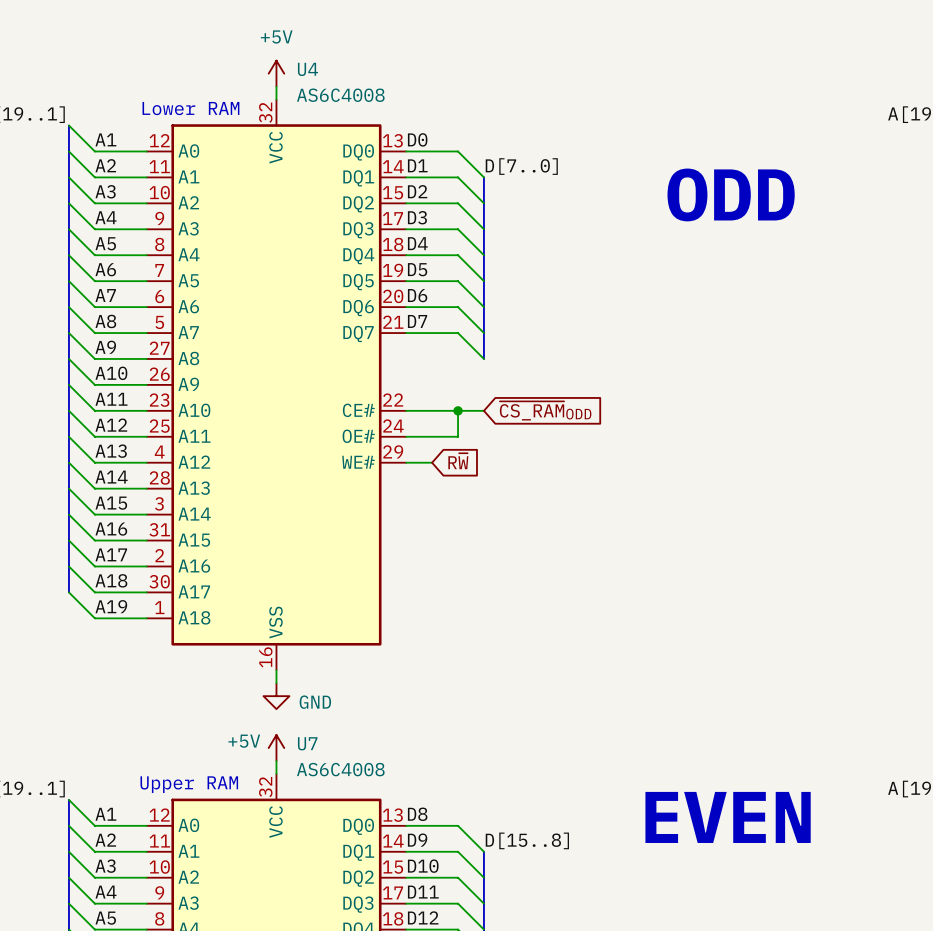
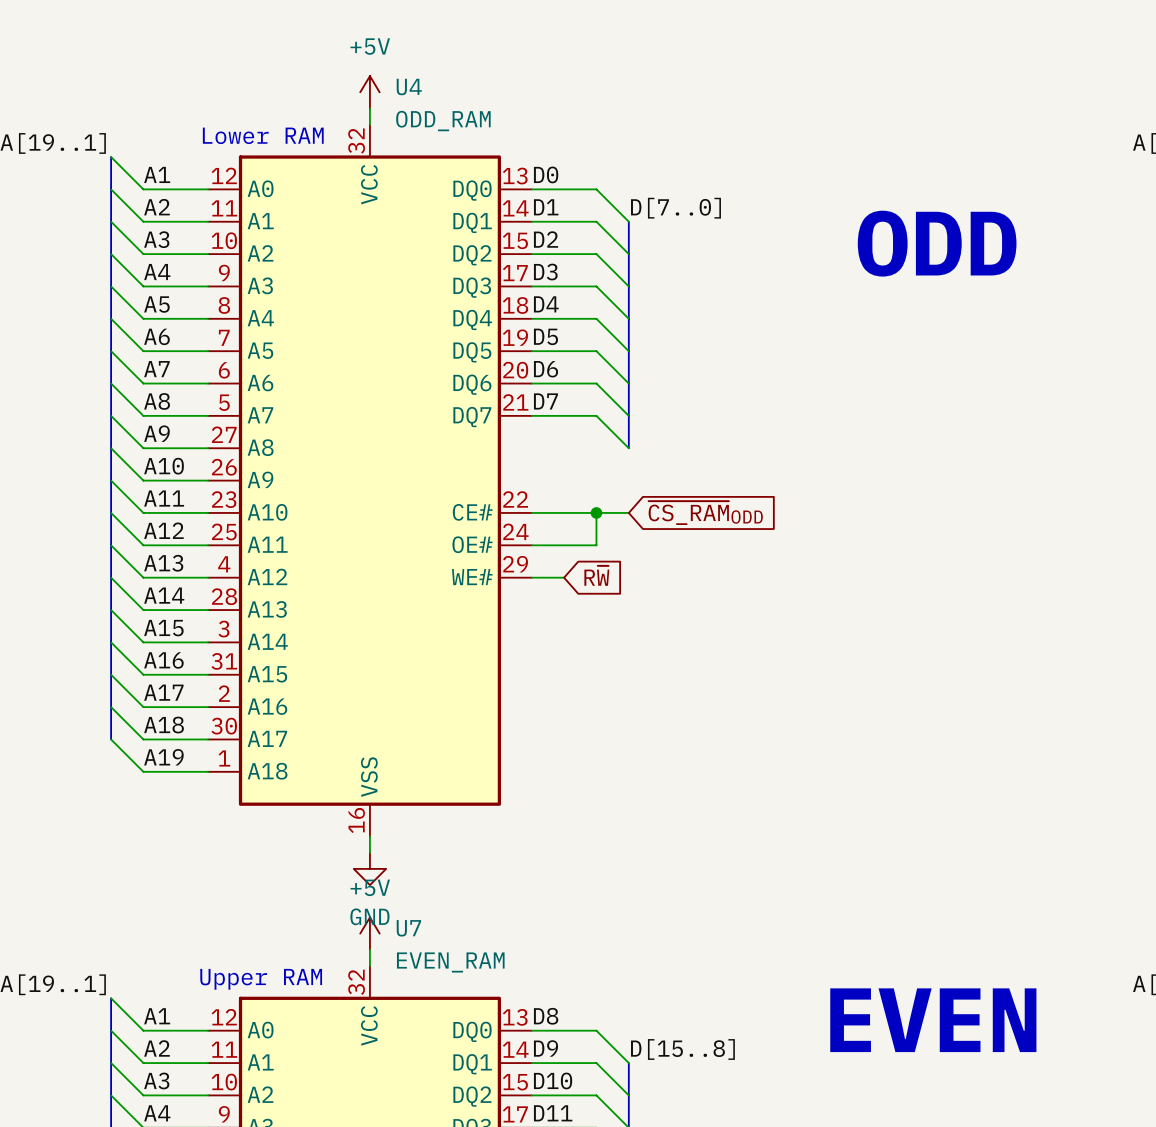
U4 value: AS6C4008 (340, 95) -> ODD_RAM (443, 121)
power symbol text position: GND (315, 702) -> GND (369, 916)
power symbol text position: +5V (244, 741) -> +5V (370, 887)
U7 value: AS6C4008 (340, 769) -> EVEN_RAM (450, 962)

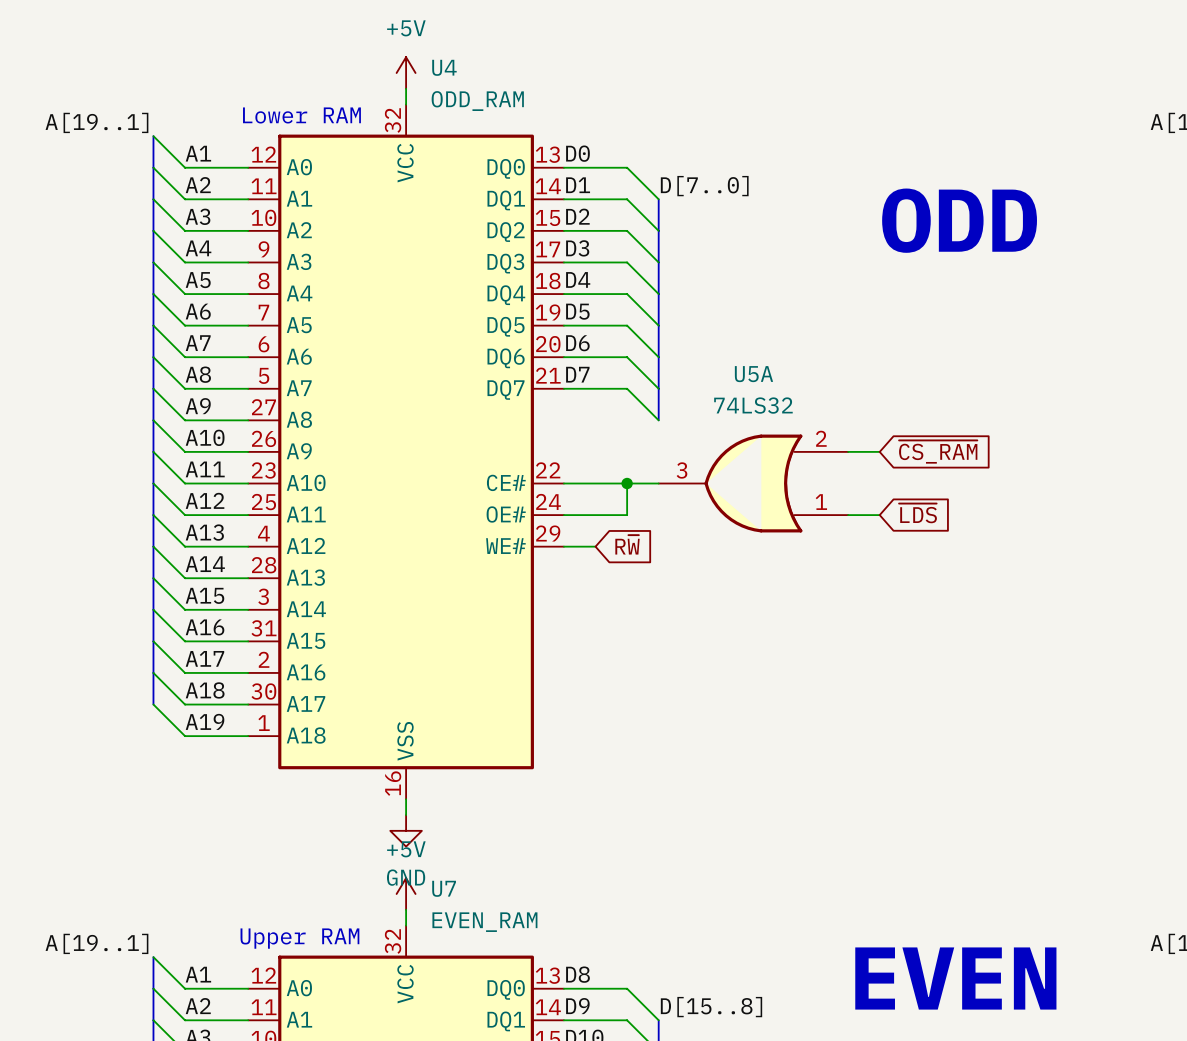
wire: none -> (848, 451) (879, 451)
U5A: none -> 74LS32 (753, 483)
global label: ~{CS_RAM}ODD (705, 513) -> ~{CS_RAM} (938, 452)
global label: none -> ~{LDS} (917, 513)
wire: none -> (848, 515) (879, 515)

